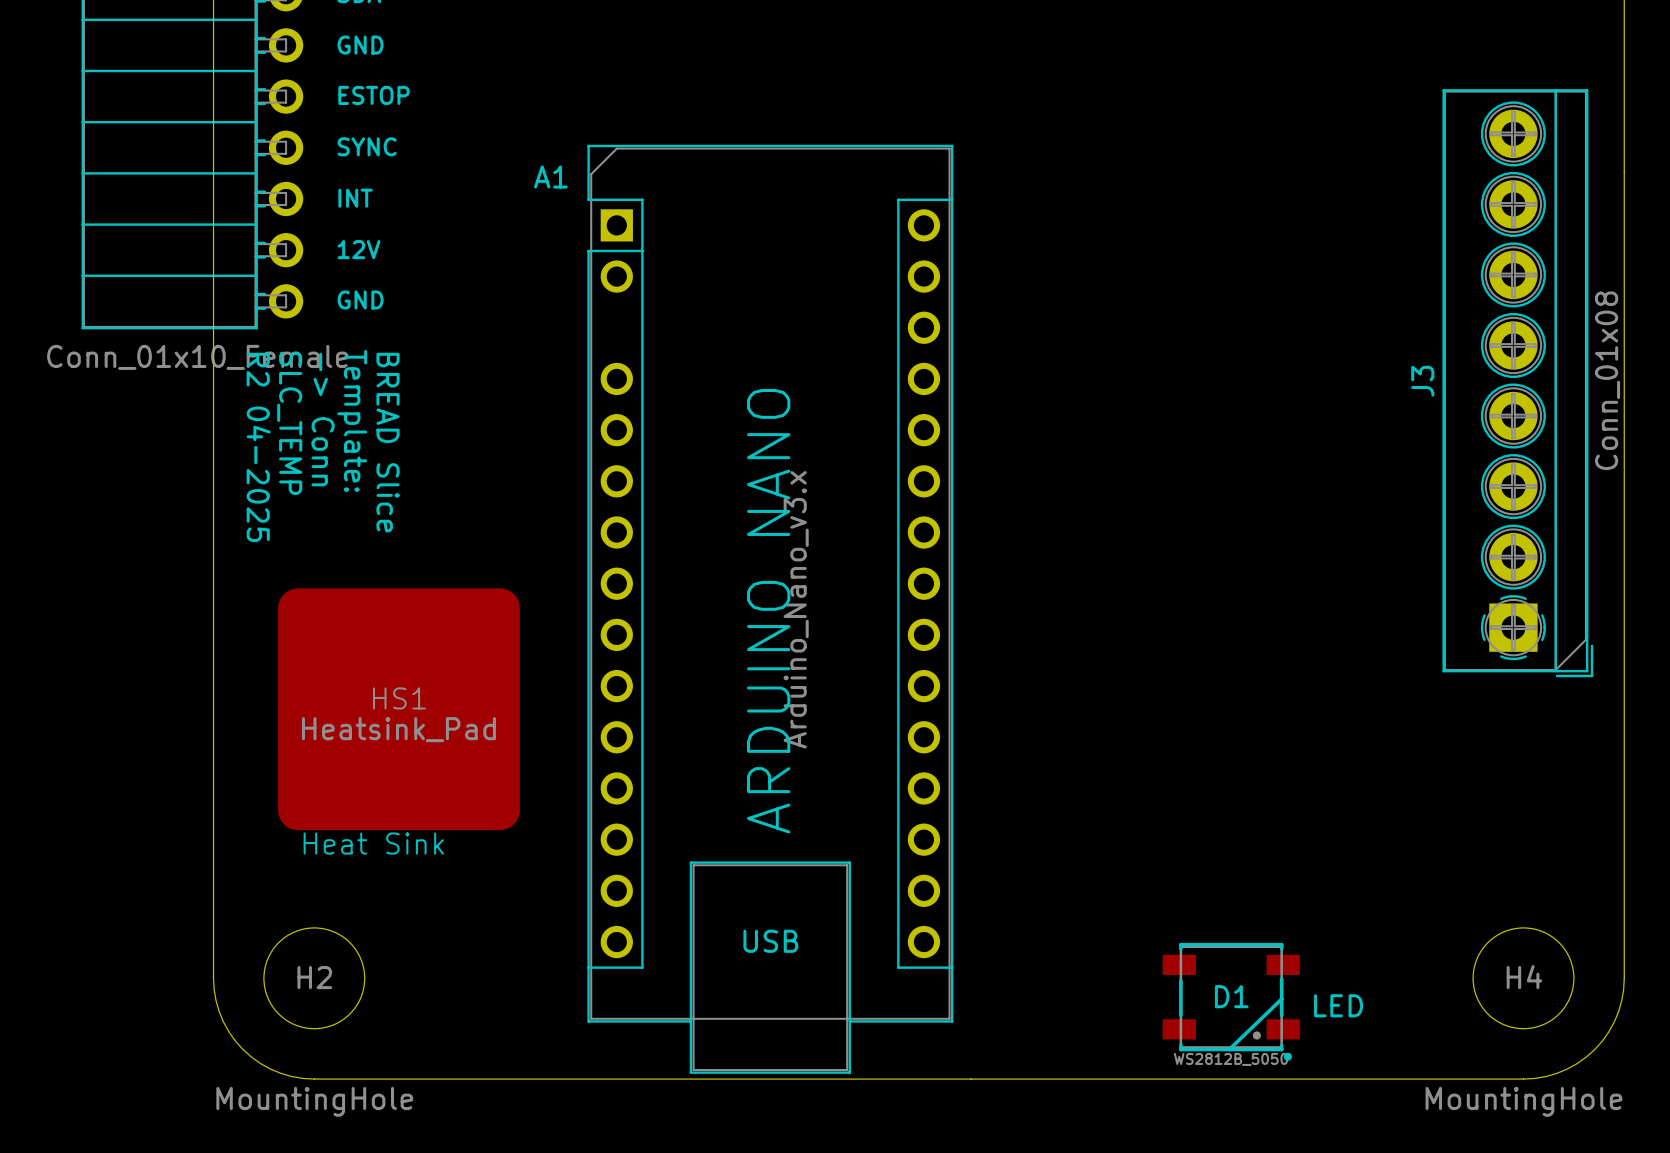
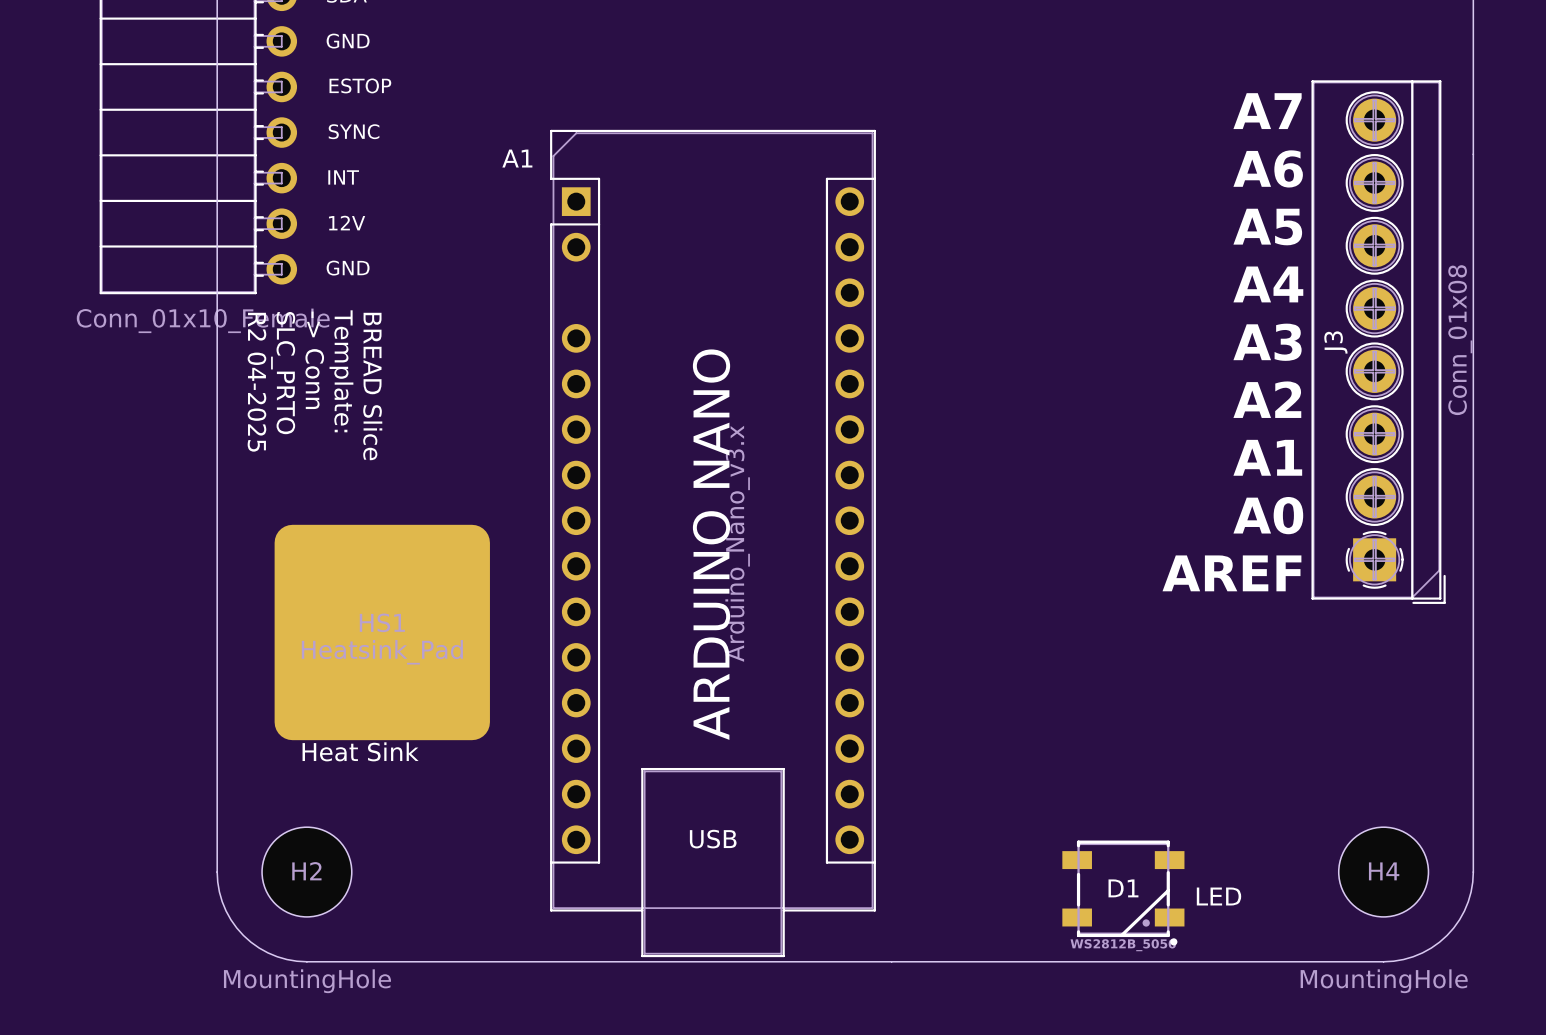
text: none -> A7 (1267, 111)
text: none -> A6 (1268, 168)
text: none -> A5 (1267, 227)
text: none -> A4 (1268, 284)
J3 name position: J3 (1422, 381) -> J3 (1335, 342)
text: none -> A3 (1267, 342)
text: SLC_TEMP (289, 423) -> SLC_PRTO (283, 373)
text: none -> A2 (1267, 399)
text: none -> A1 (1267, 457)
text: none -> A0 (1268, 515)
text: none -> AREF (1231, 573)

